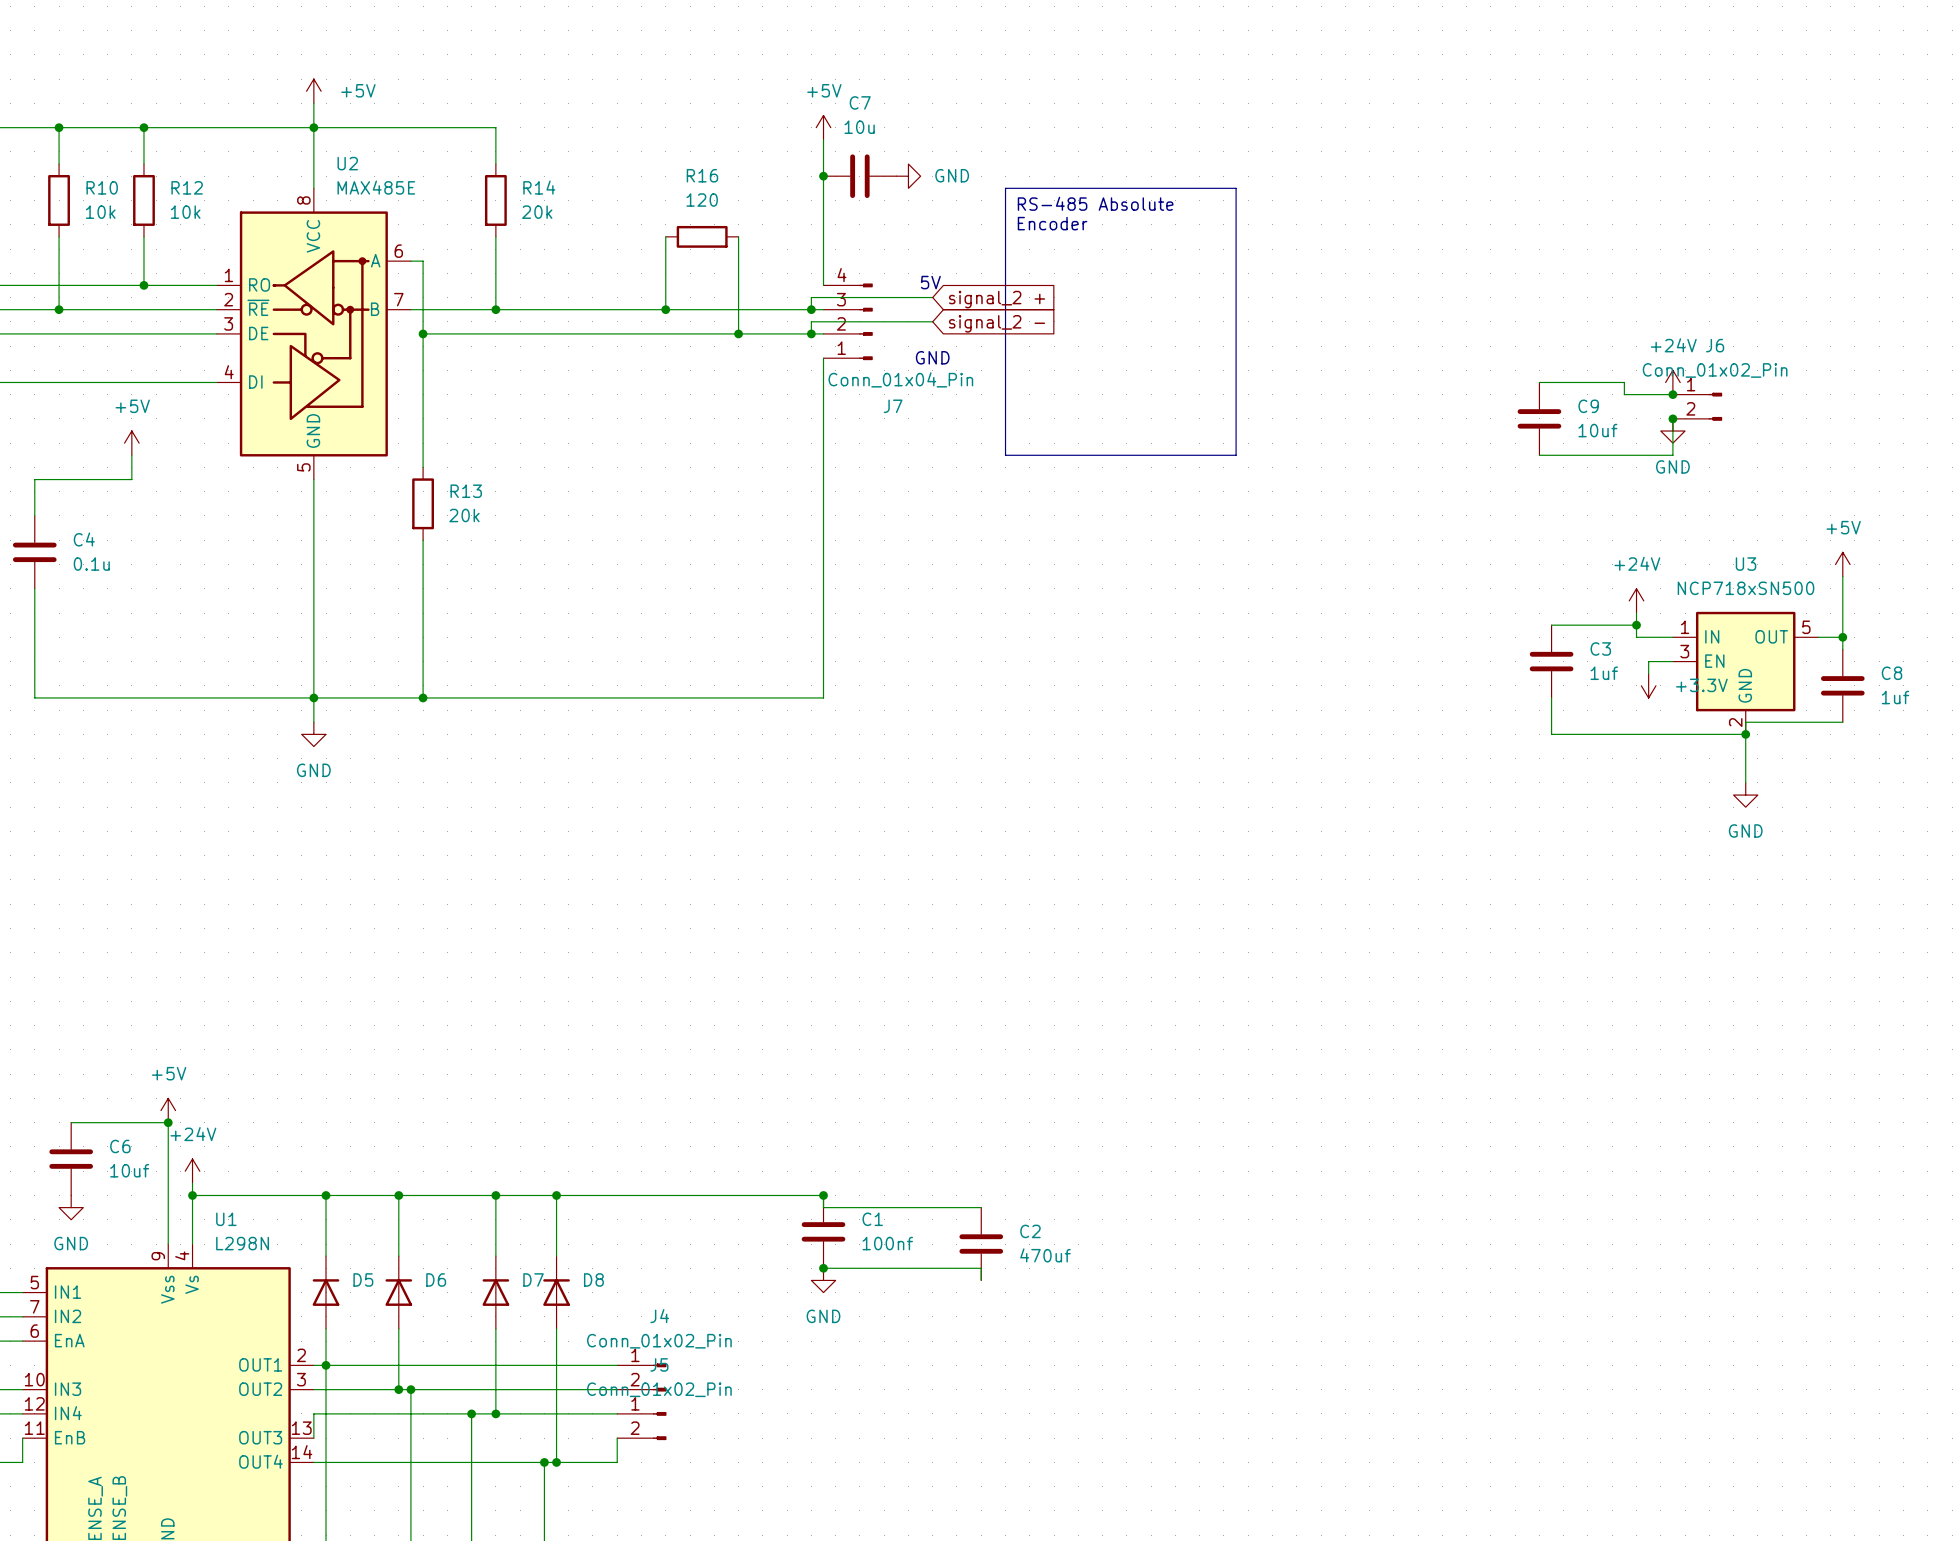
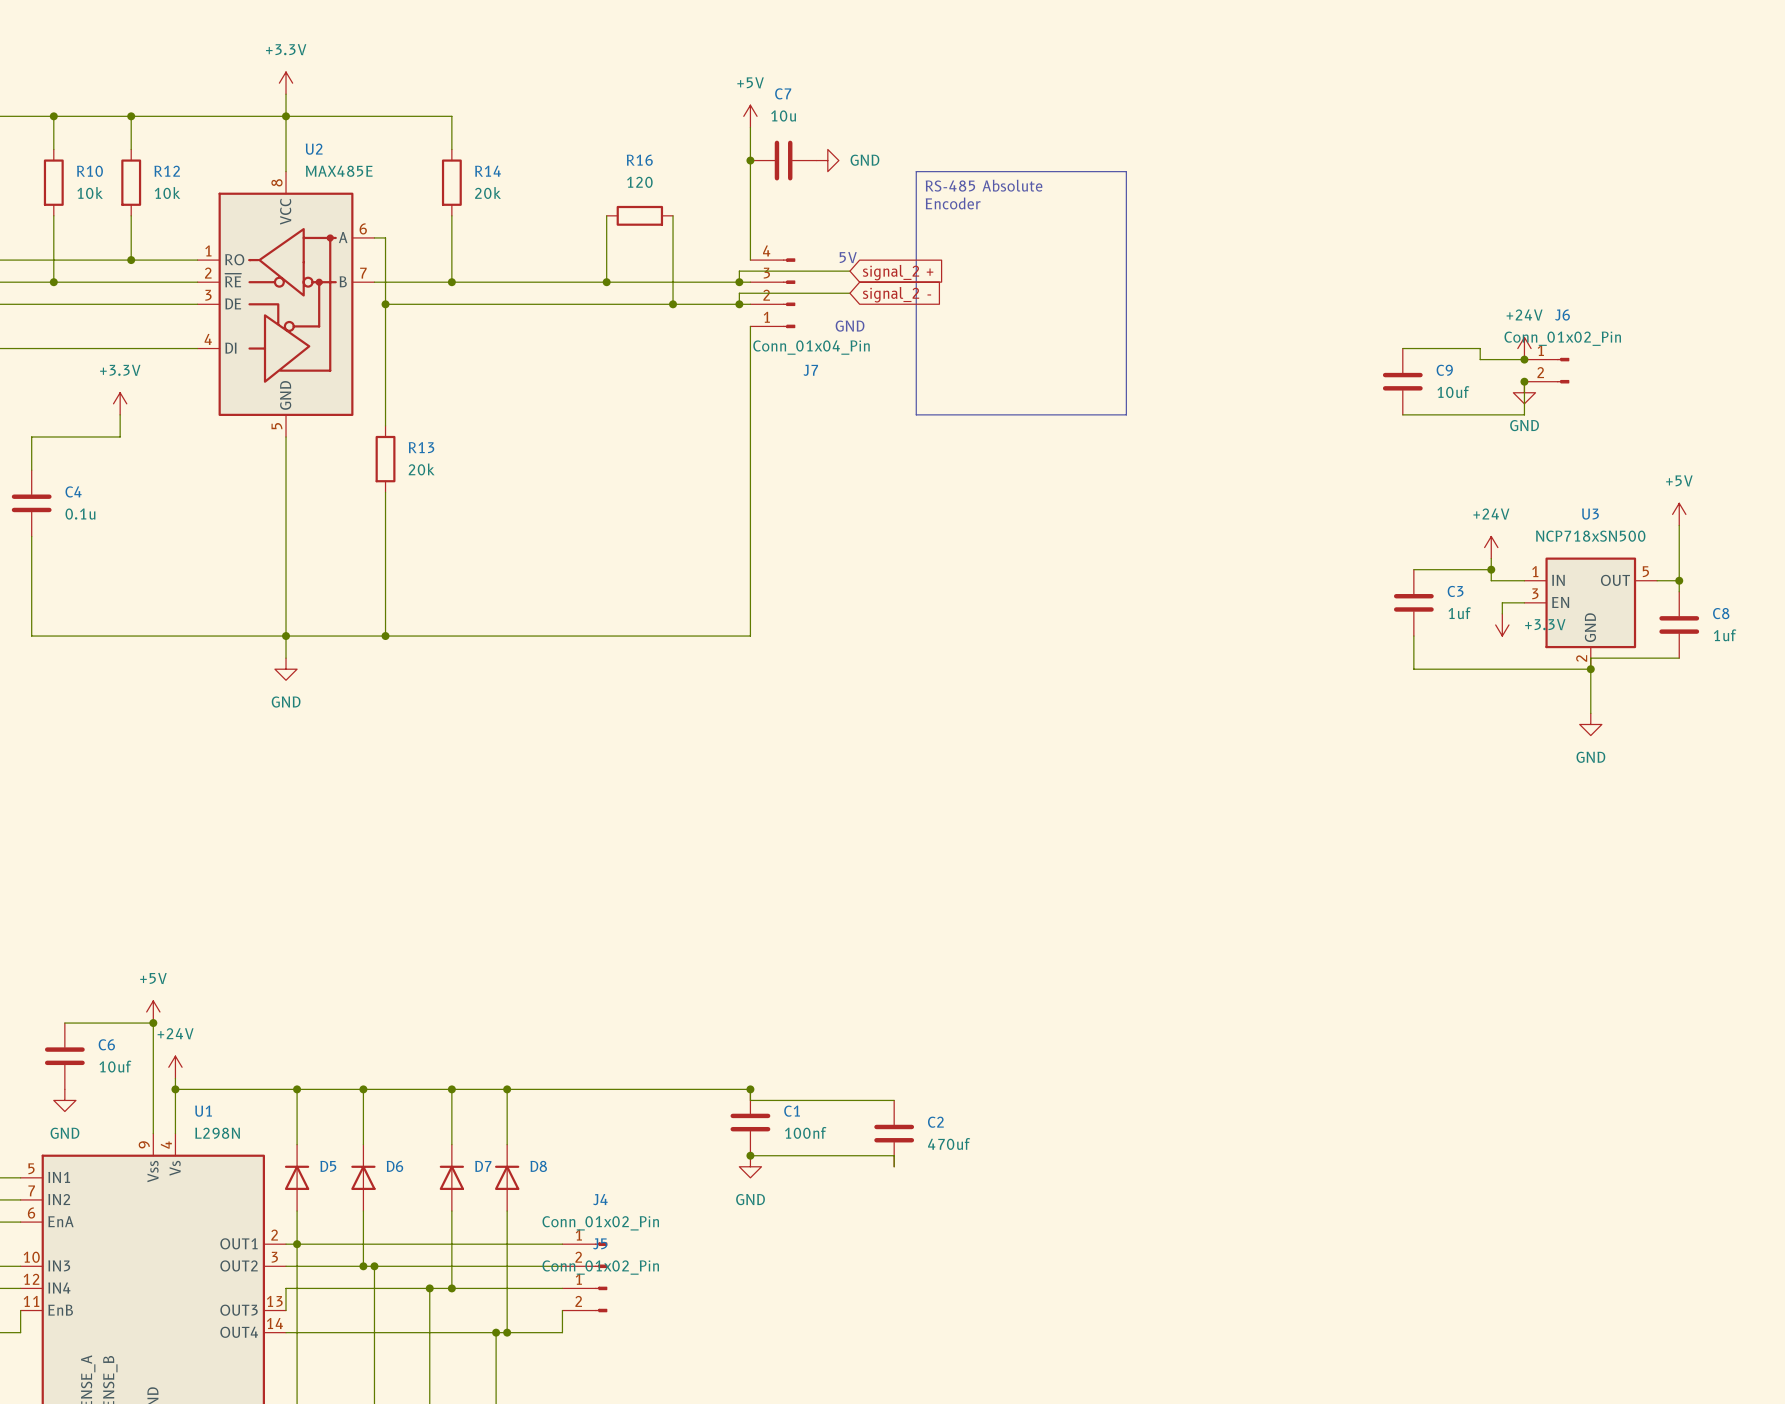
power symbol: +5V (313, 91) -> +3.3V (286, 83)
power symbol: +5V (131, 443) -> +3.3V (120, 403)

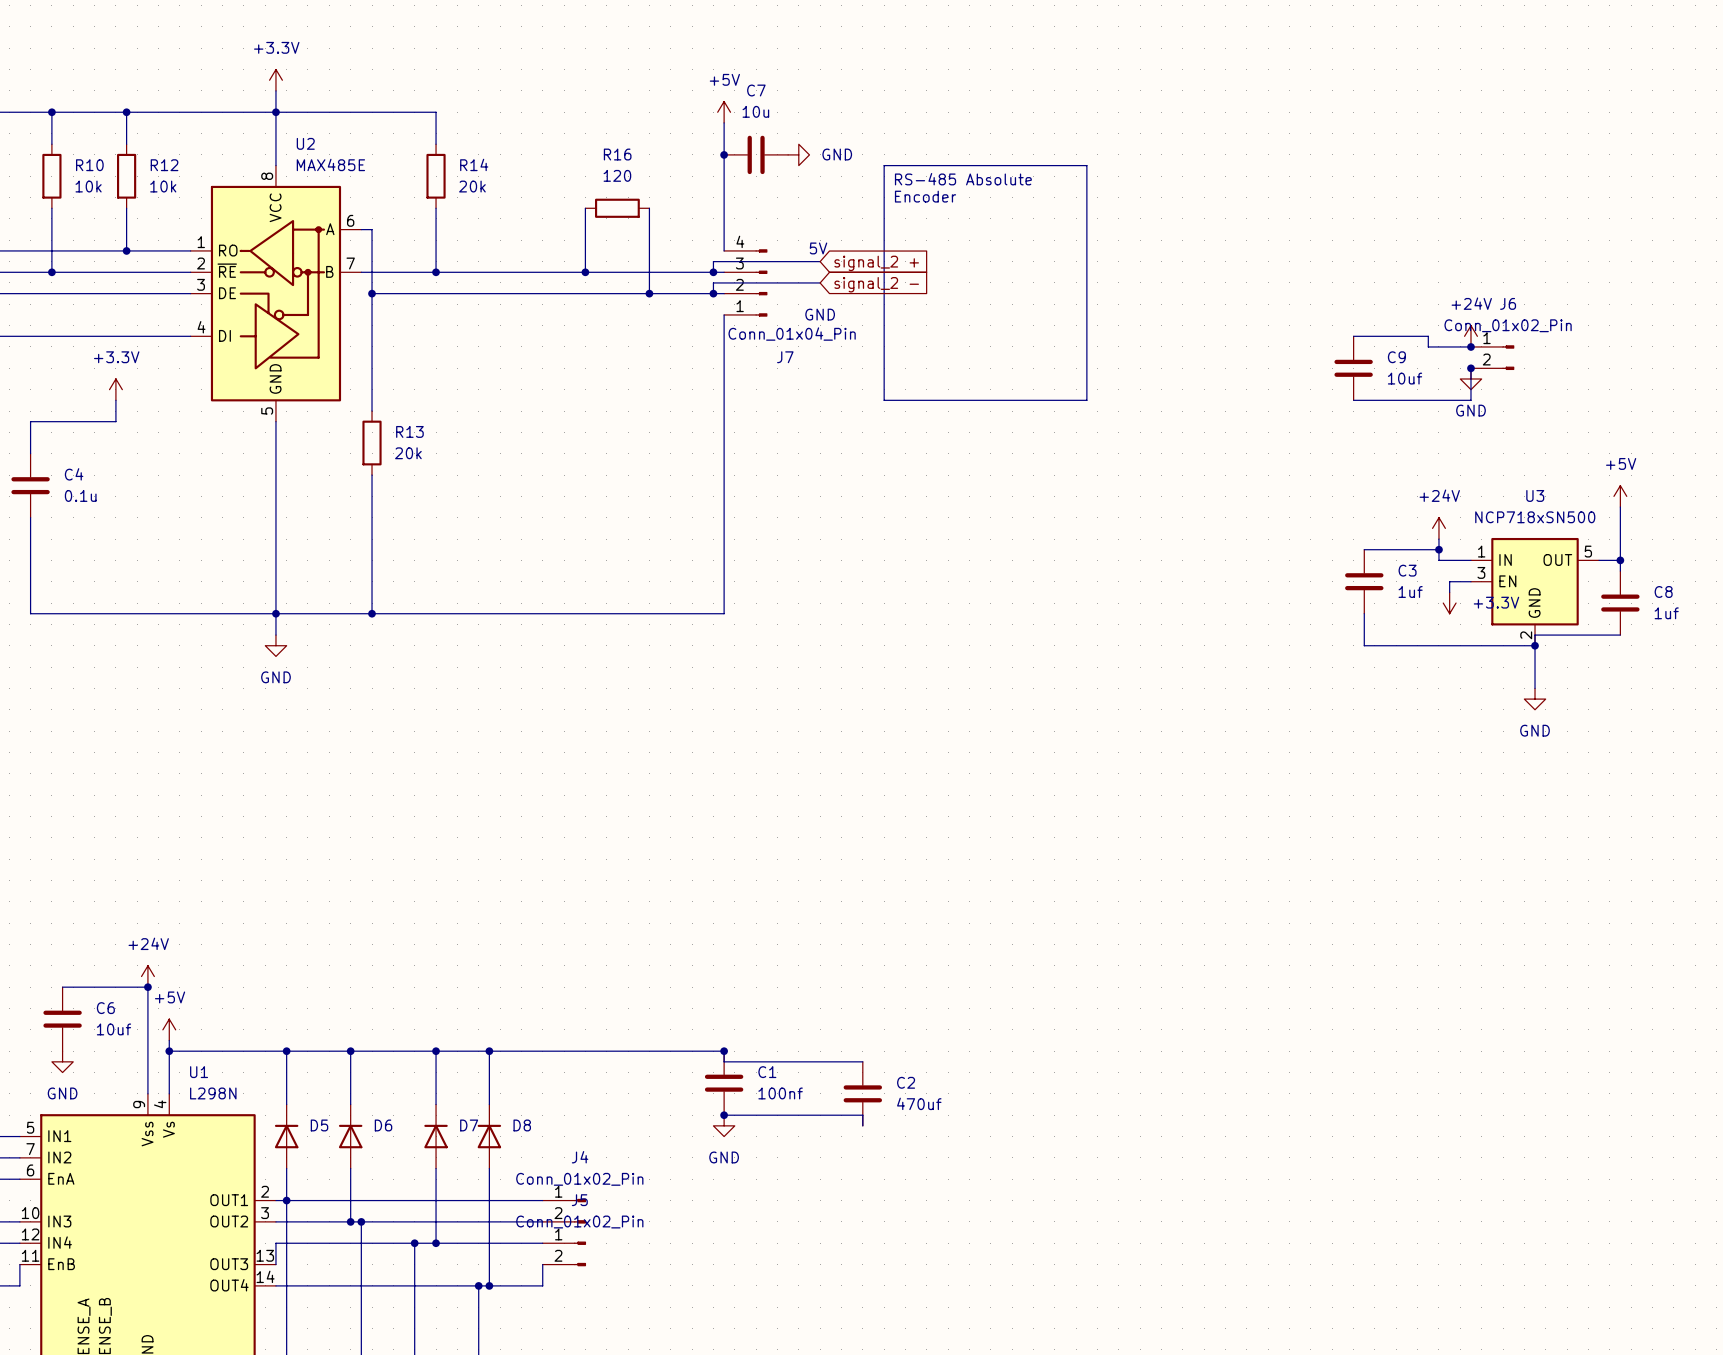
power symbol: +5V (153, 1011) -> +24V (147, 976)
power symbol: +24V (175, 1067) -> +5V (169, 1029)

